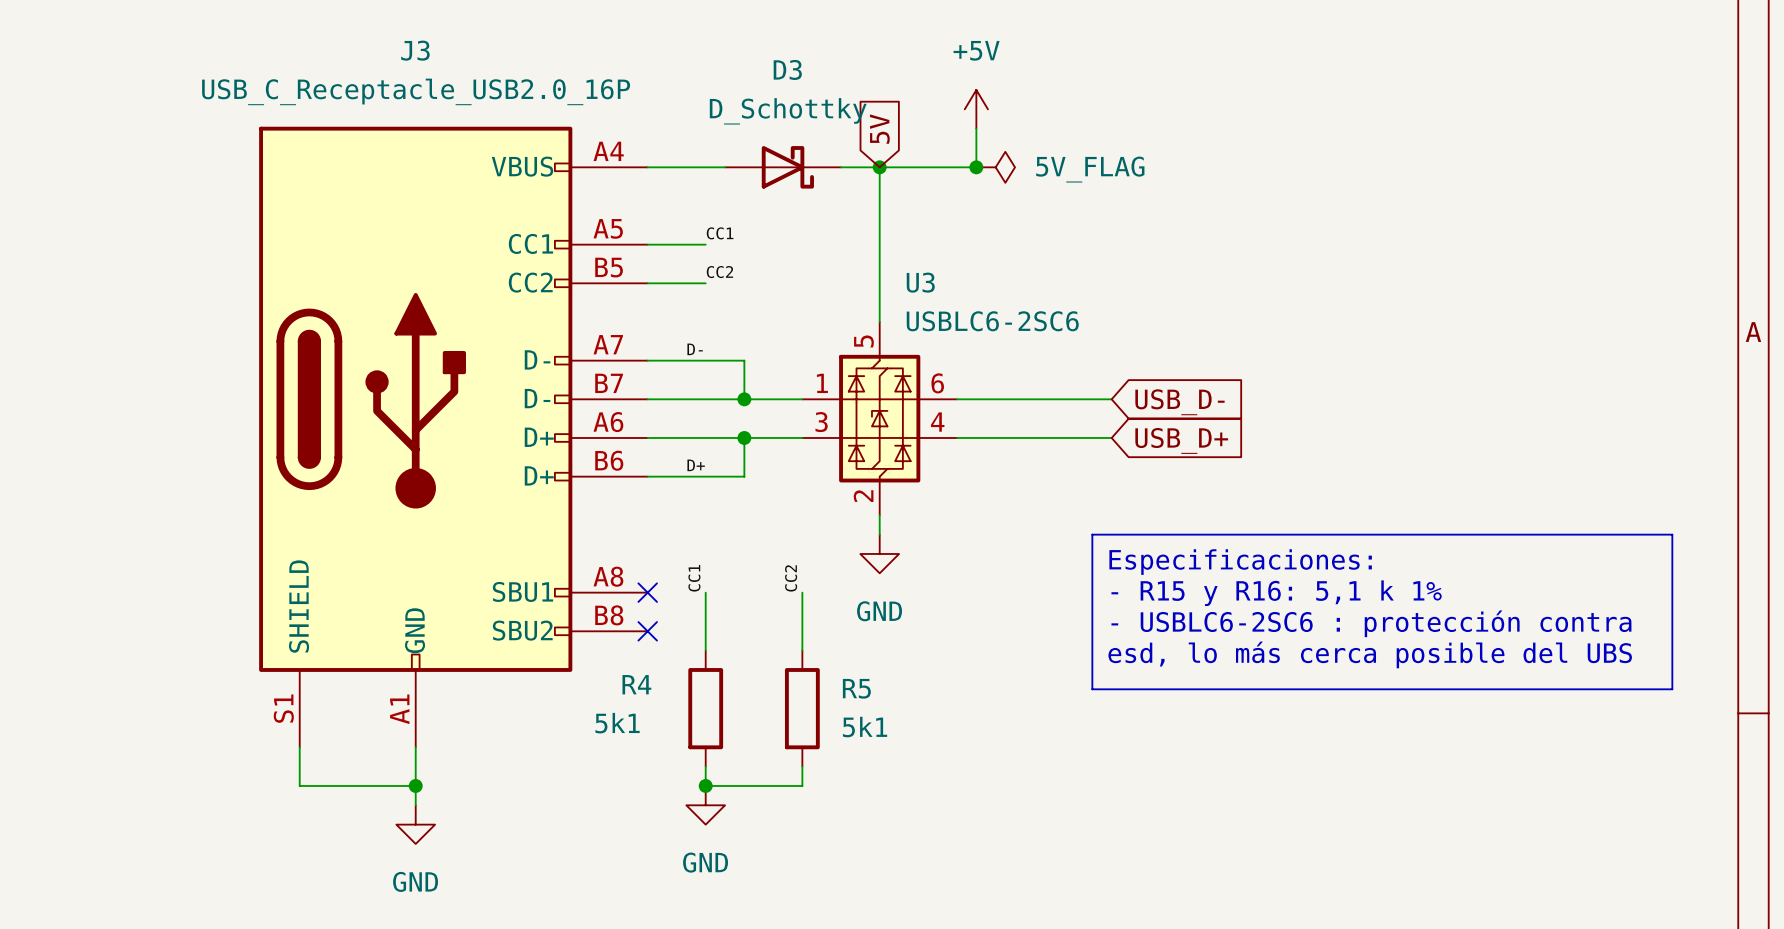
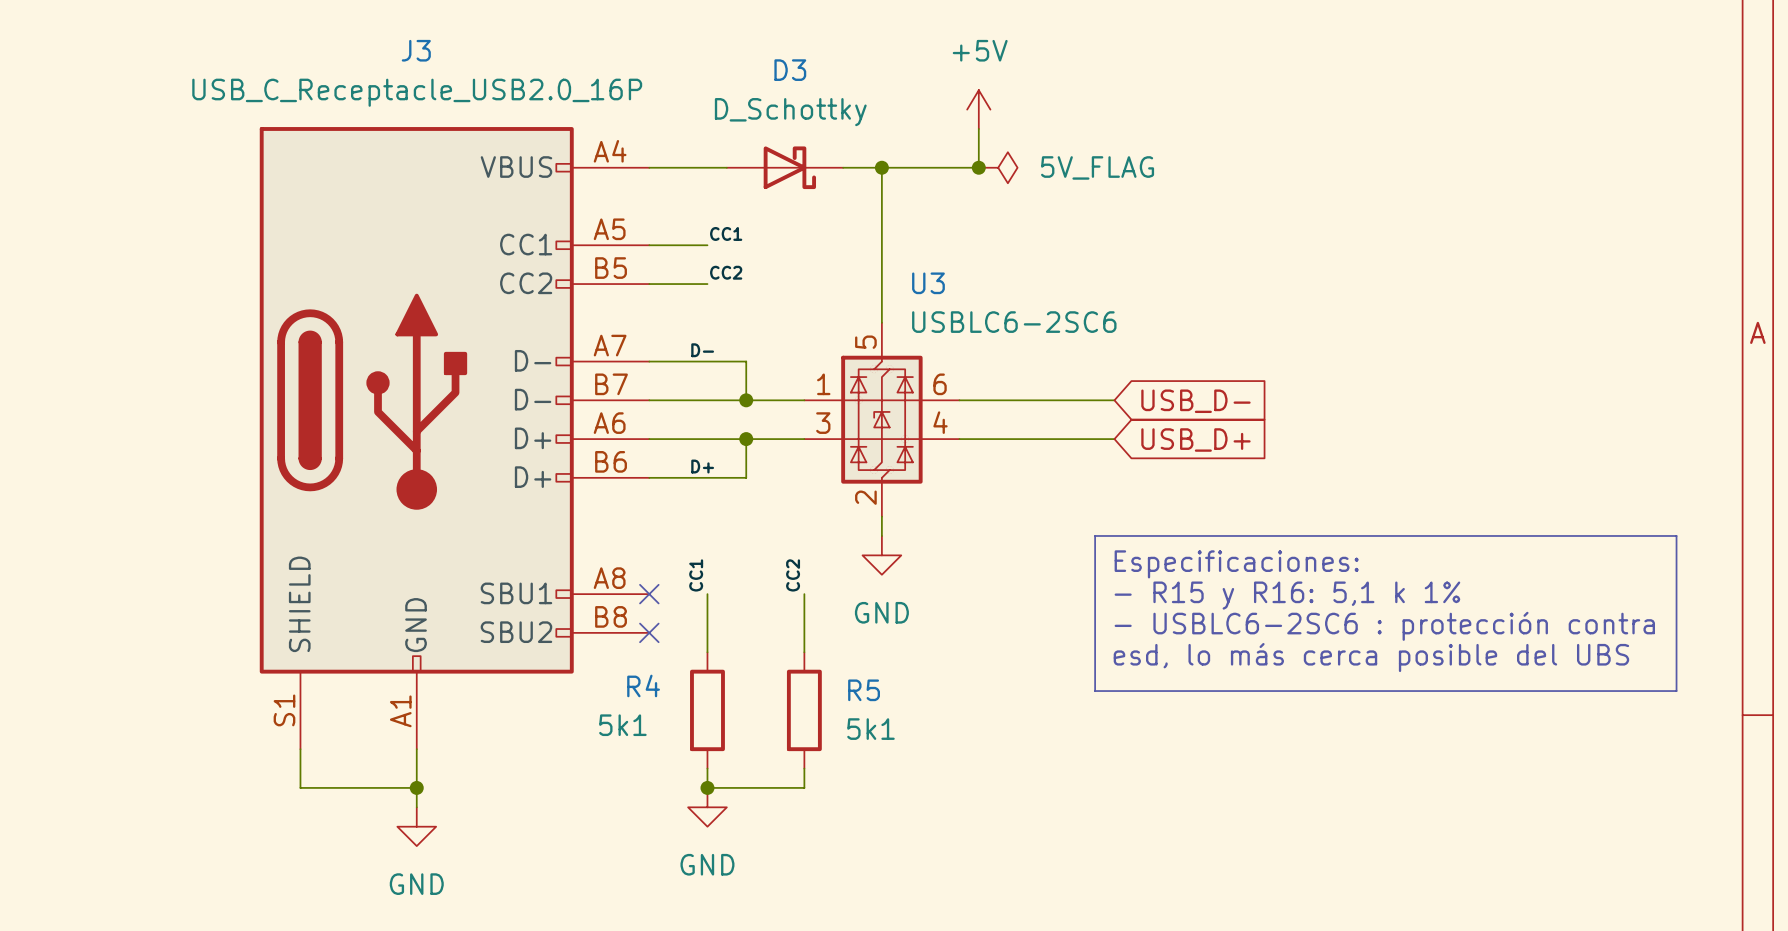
global label: 5V (879, 129) -> none

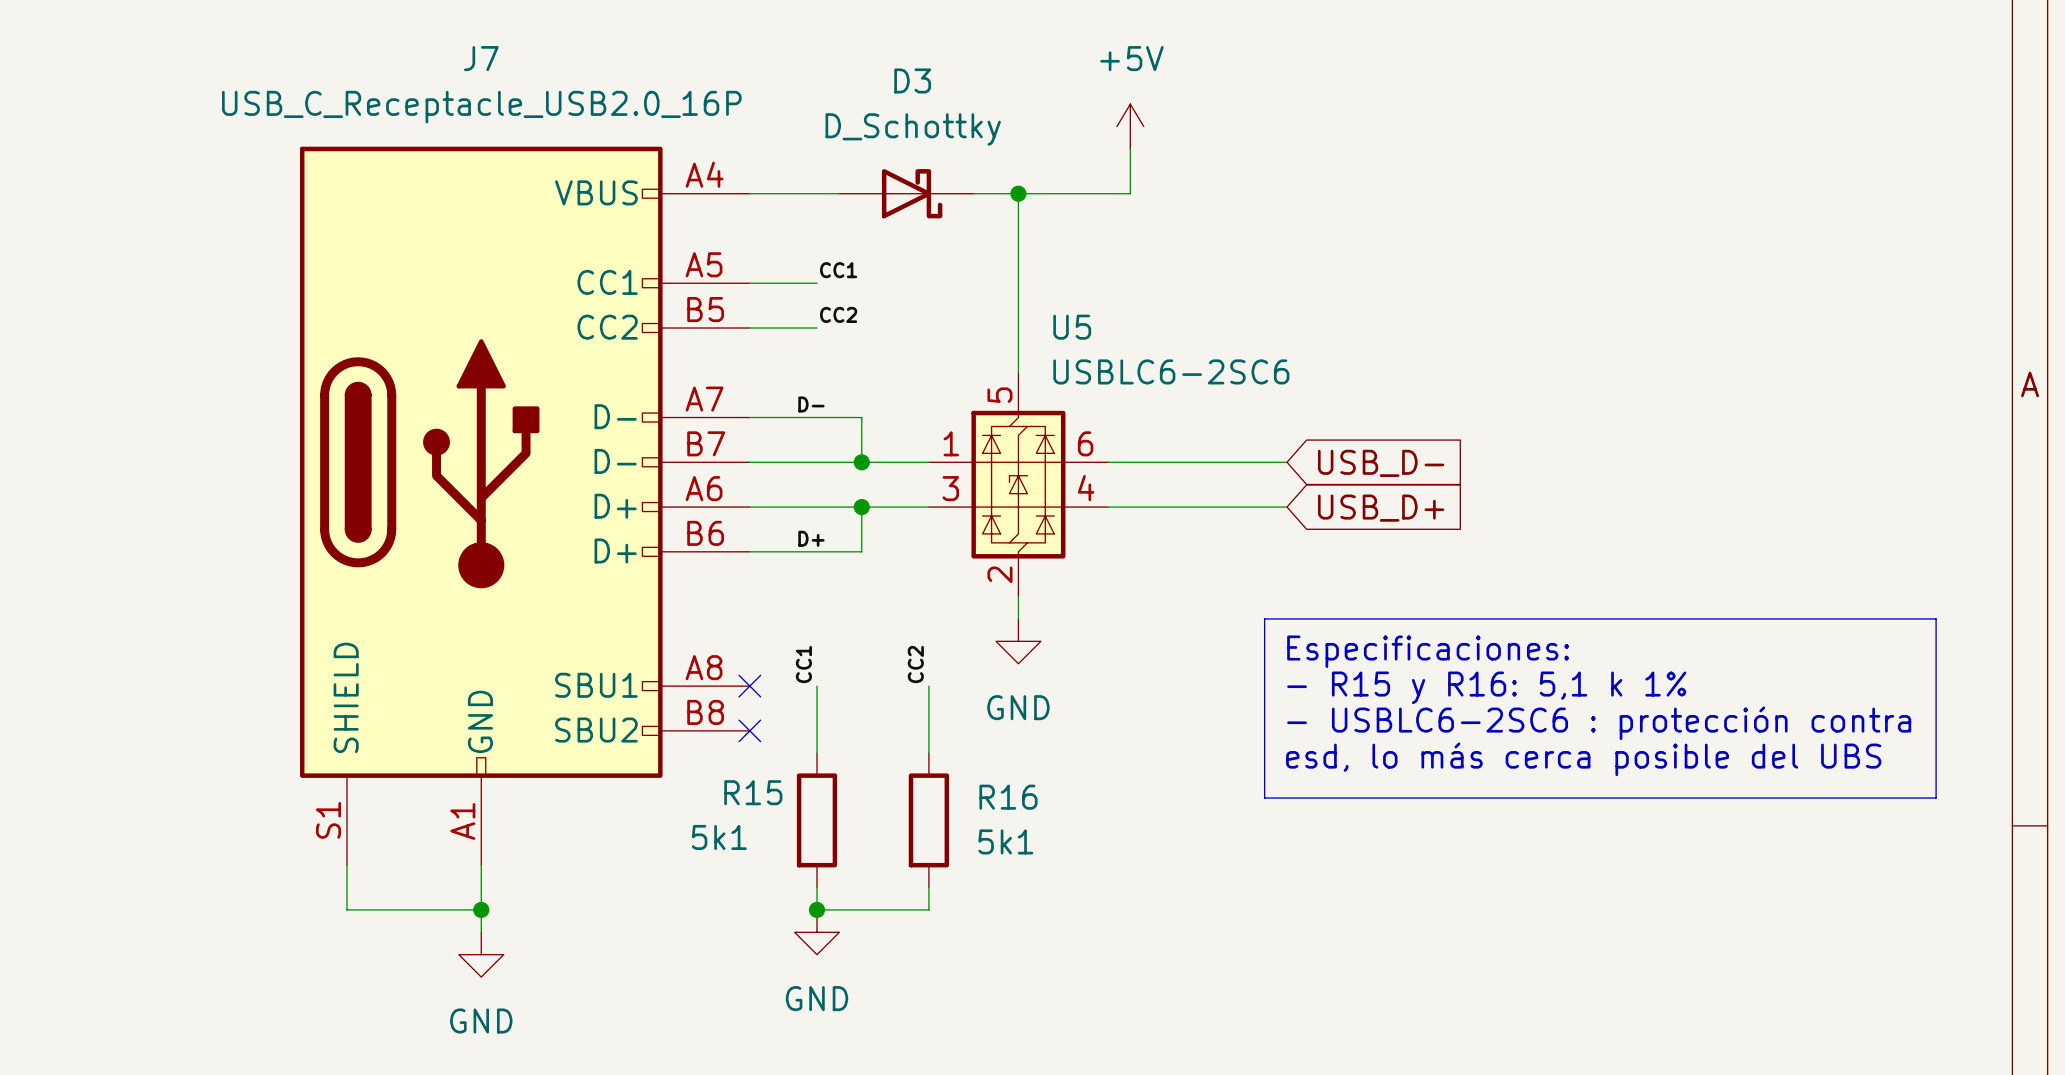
J3 name: J3 (416, 50) -> J7 (481, 58)
junction: (978, 167) -> none
power symbol: 5V_FLAG (998, 167) -> none
U3 name: U3 (928, 283) -> U5 (1072, 327)
R4 name: R4 (643, 685) -> R15 (753, 792)
R5 name: R5 (864, 690) -> R16 (1008, 797)

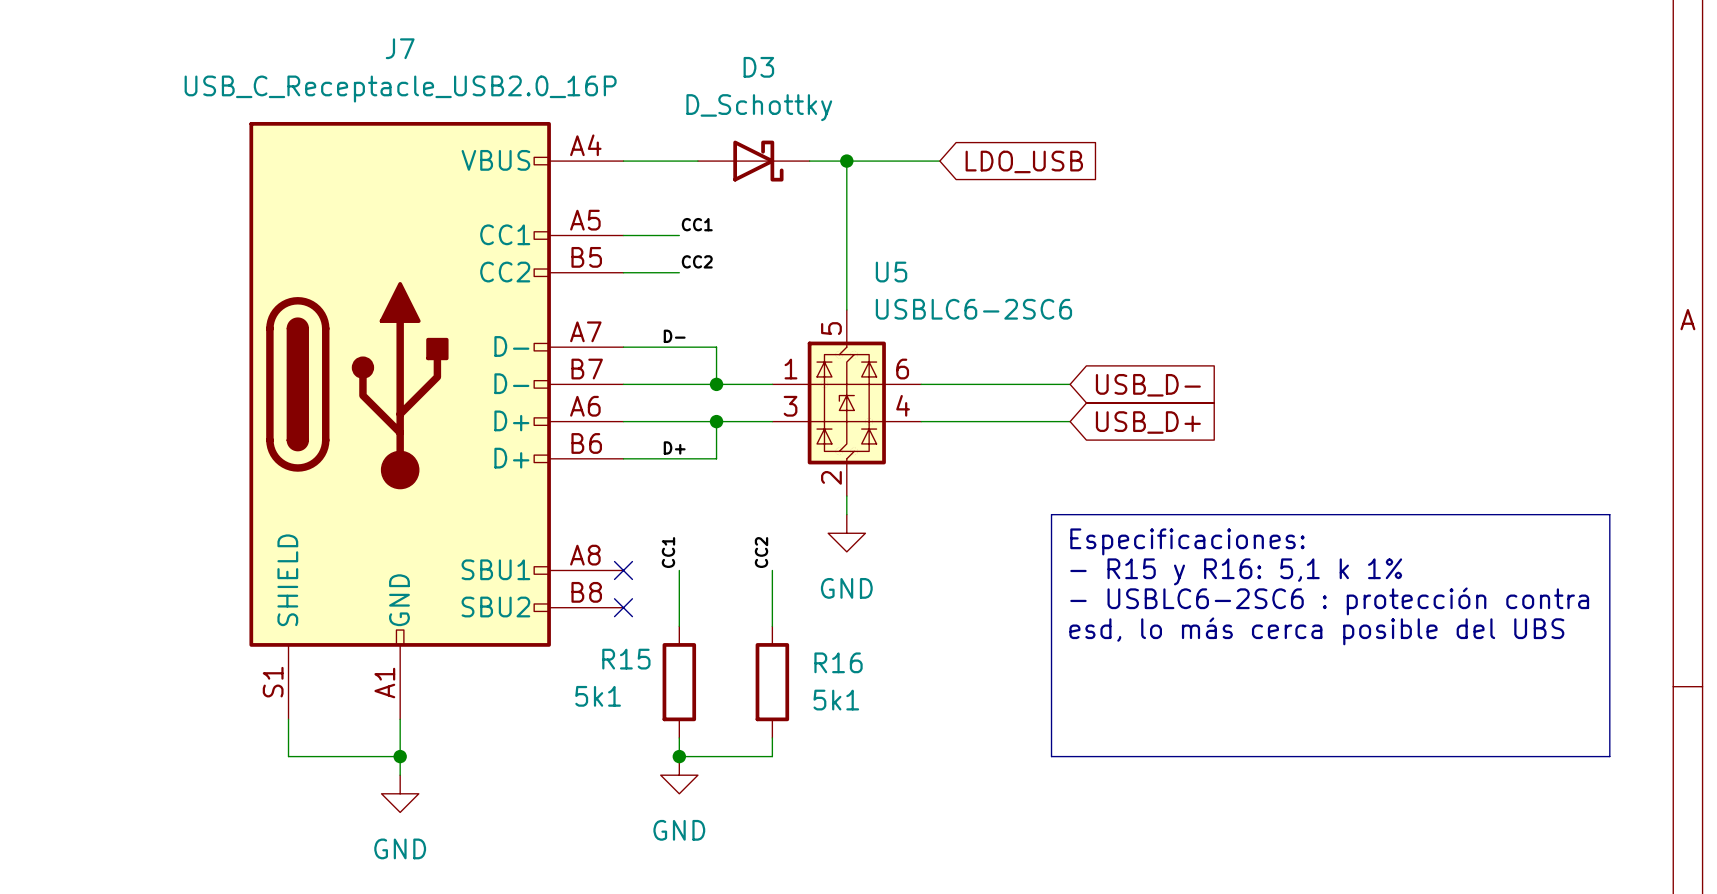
power symbol: +5V (1130, 126) -> none
wire: (1130, 148) (1130, 193) -> none
global label: none -> LDO_USB (1024, 161)
line: (1264, 798) (1936, 798) -> (1051, 663) (1051, 756) (1609, 756) (1609, 663)

